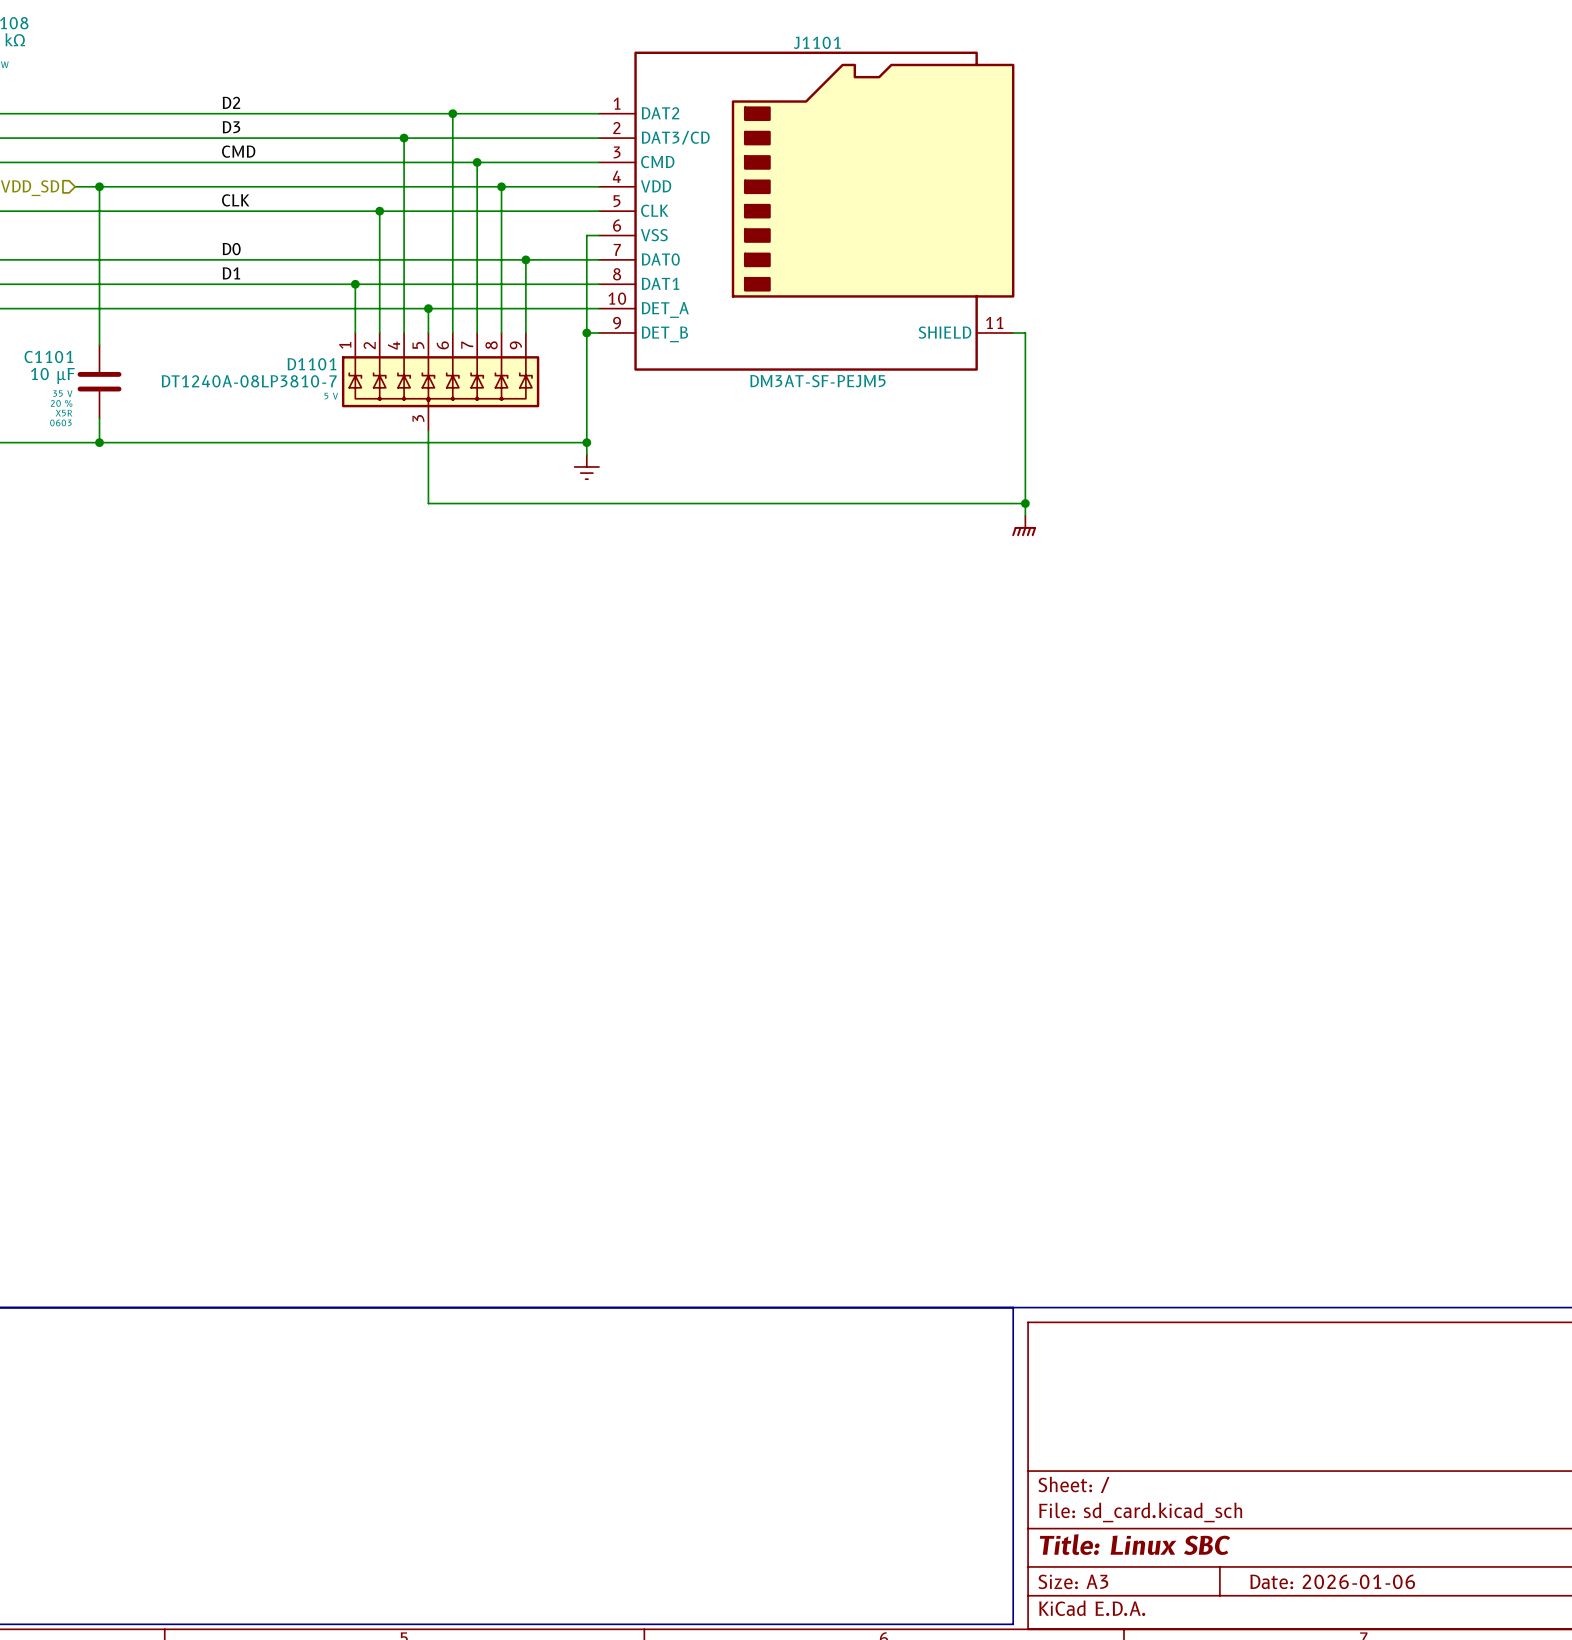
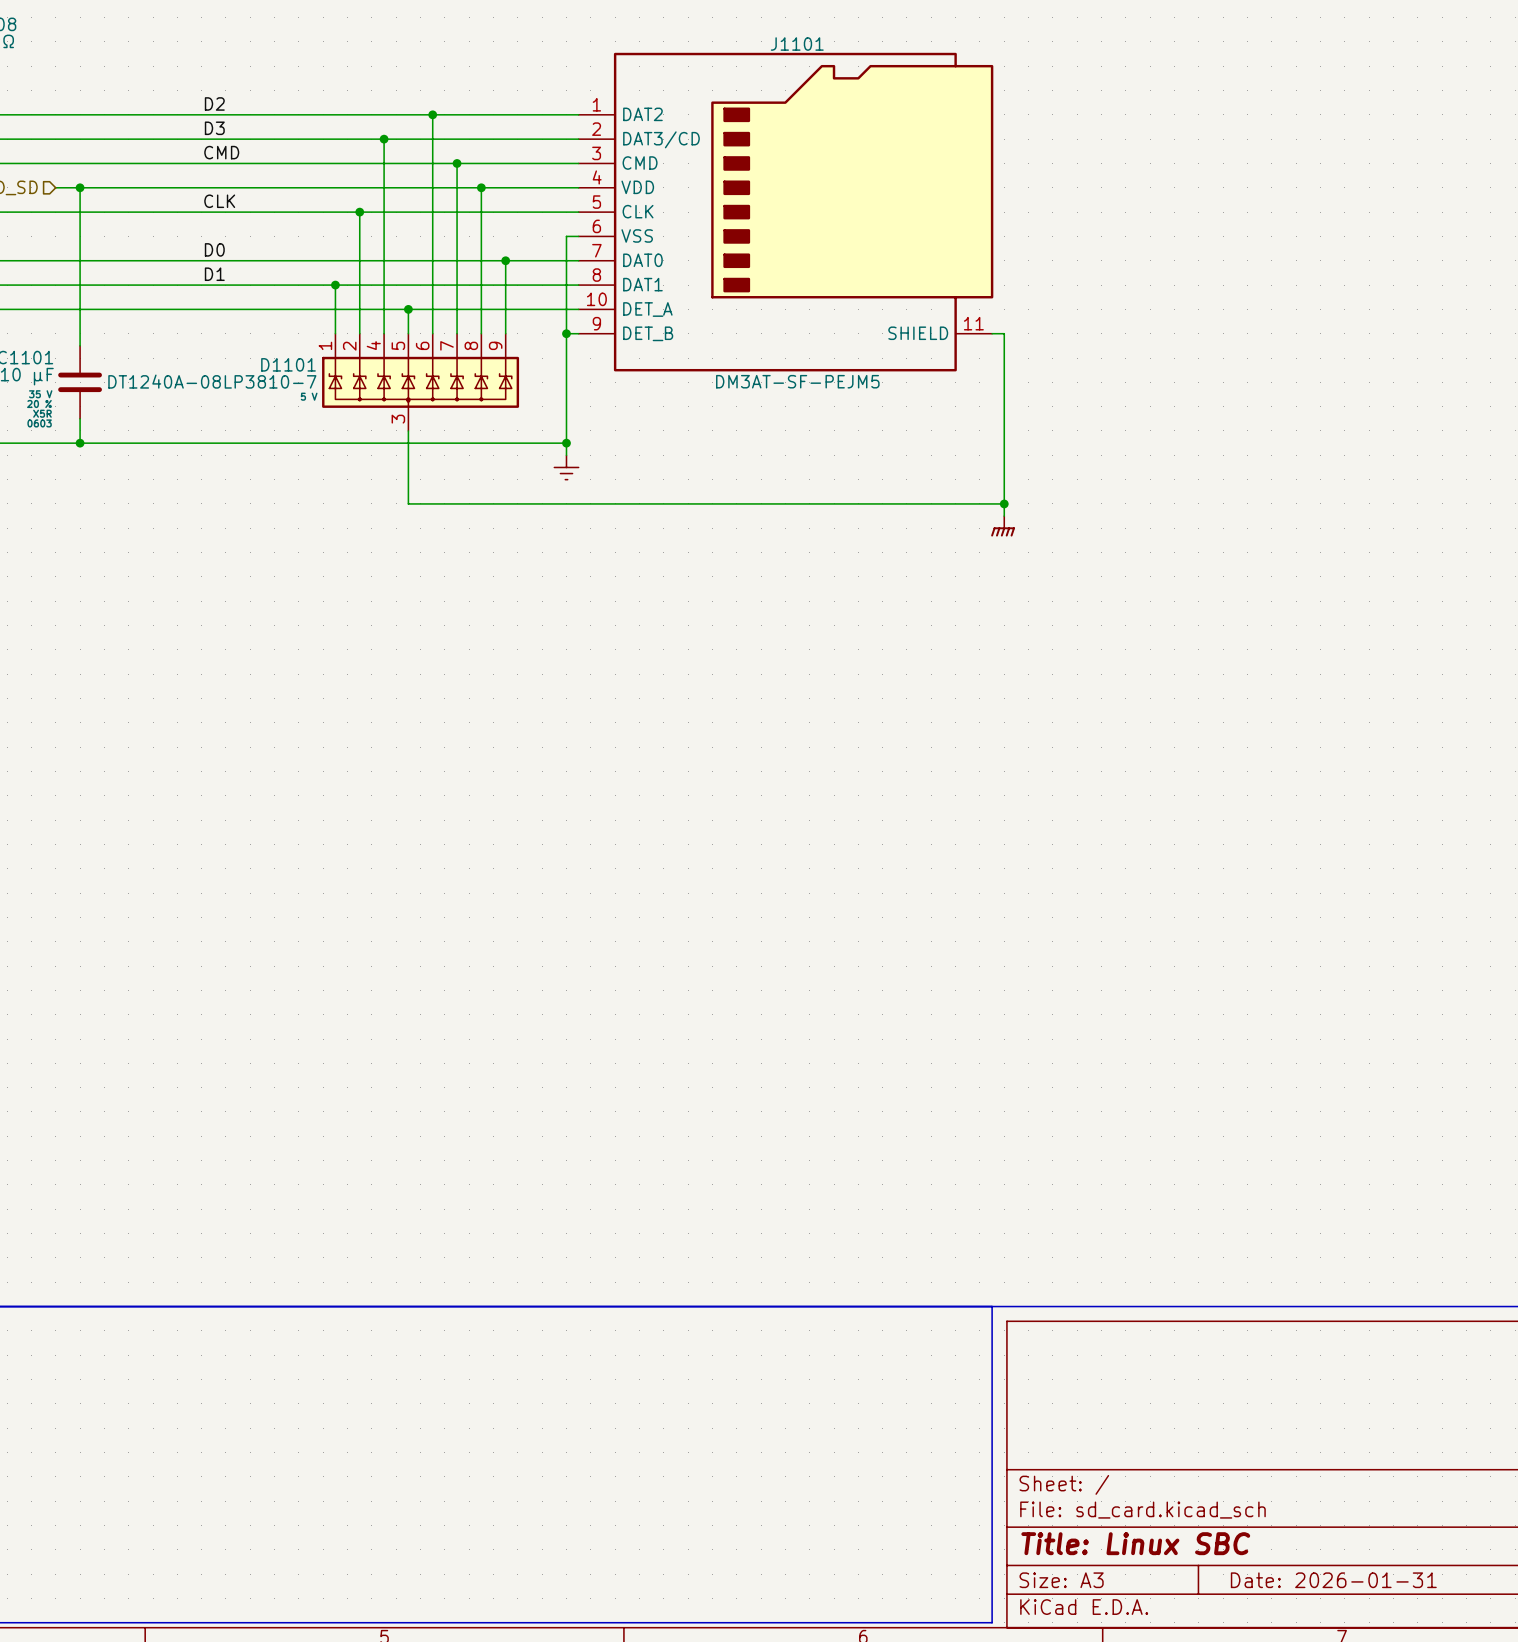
title block: Date: 2026-01-06 (1332, 1581) -> Date: 2026-01-31 (1333, 1580)

